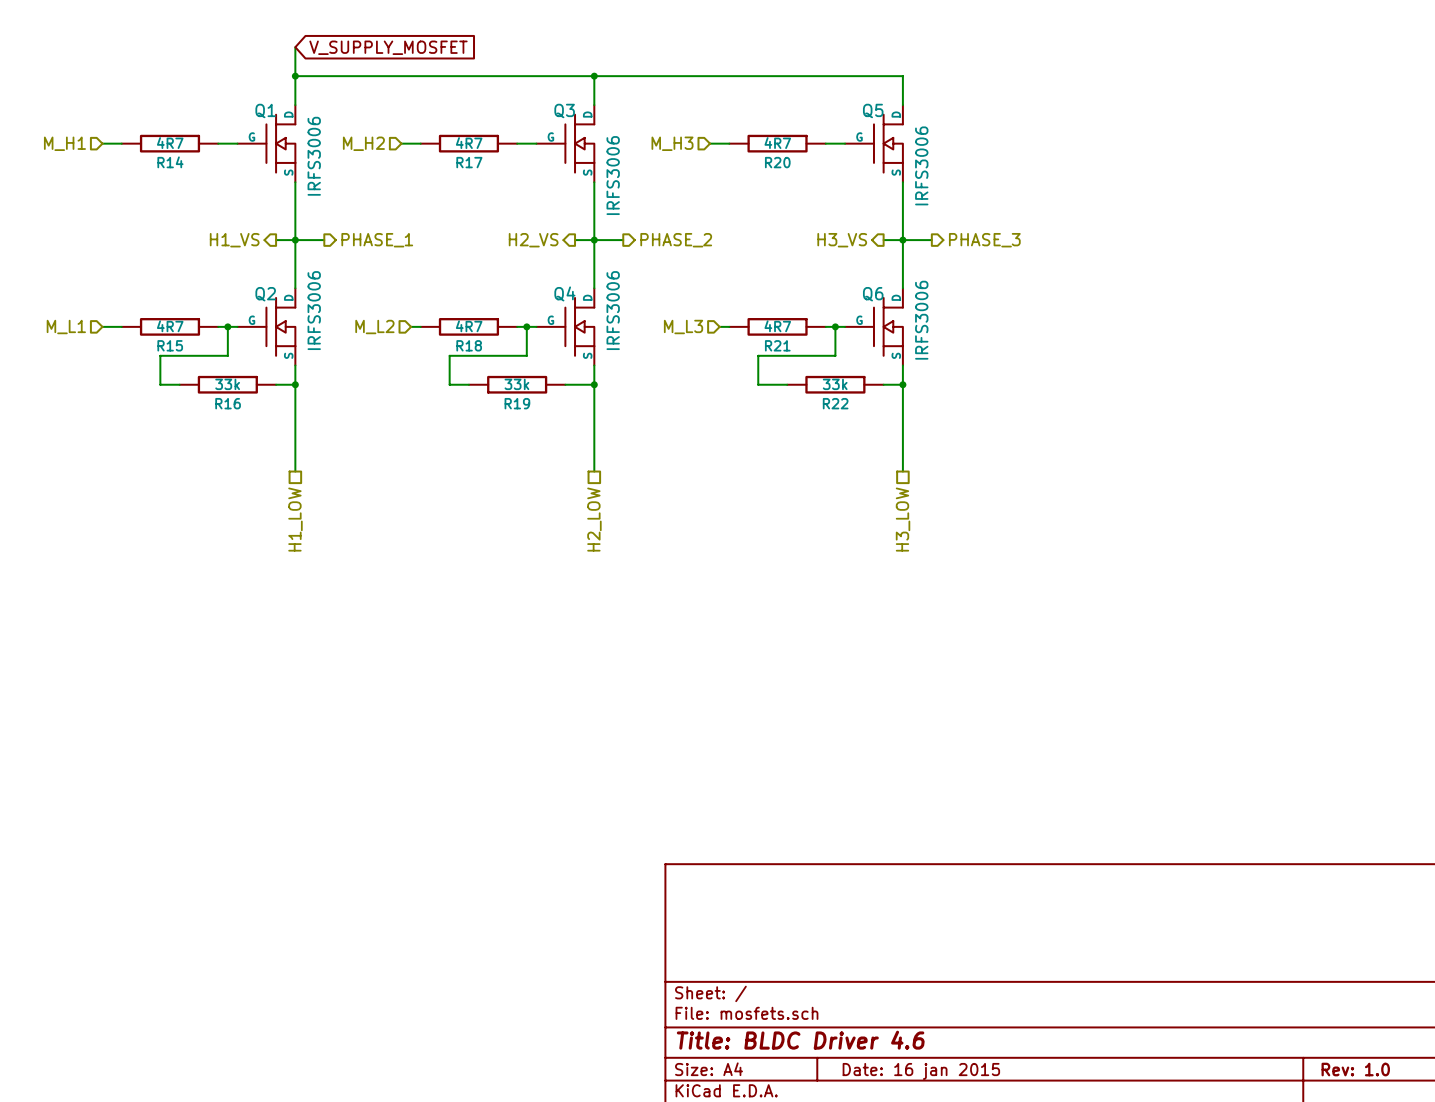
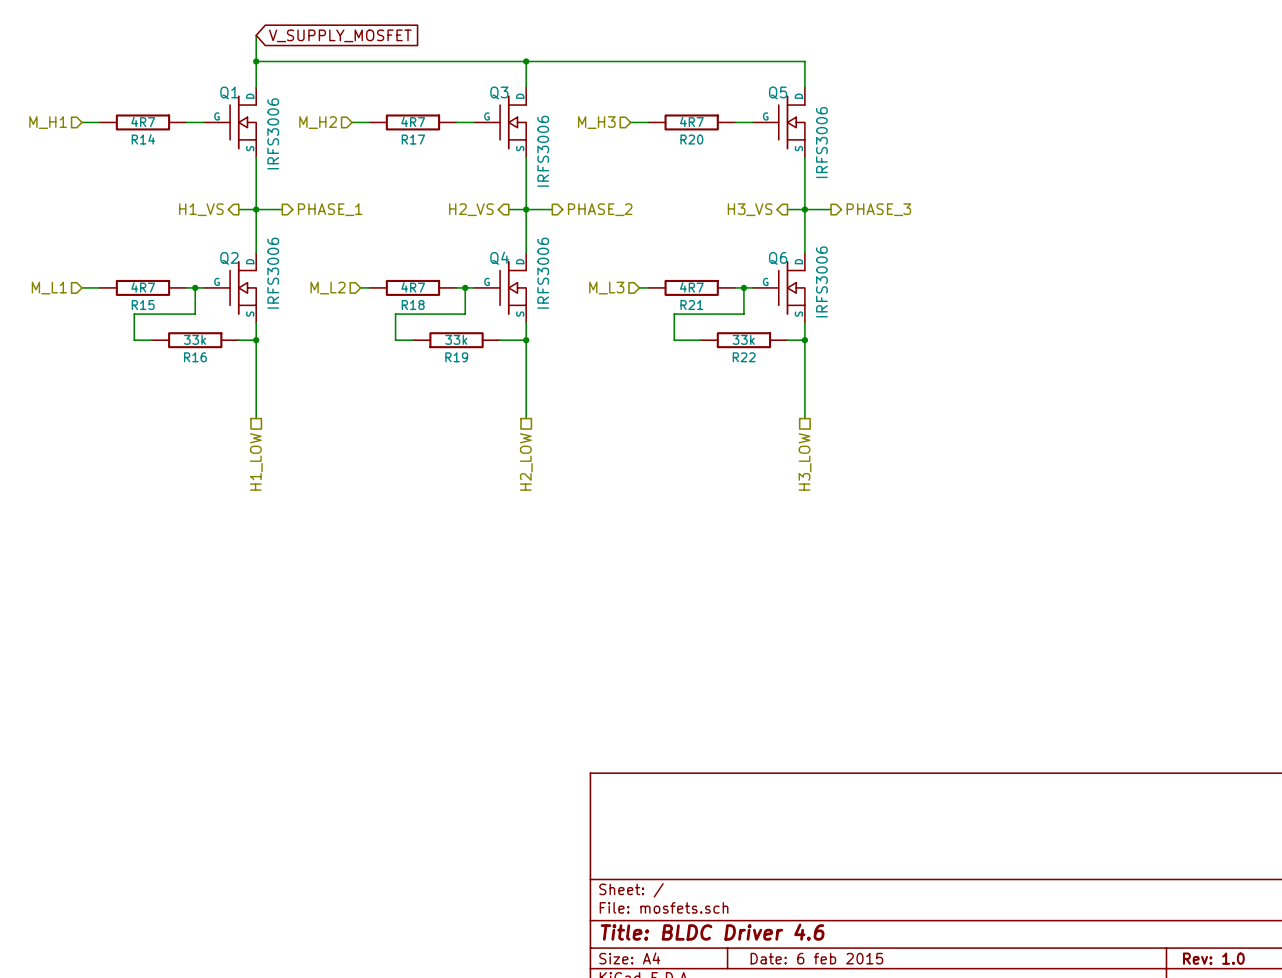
title block: Date: 16 jan 2015 (921, 1071) -> Date: 6 feb 2015 (816, 958)

